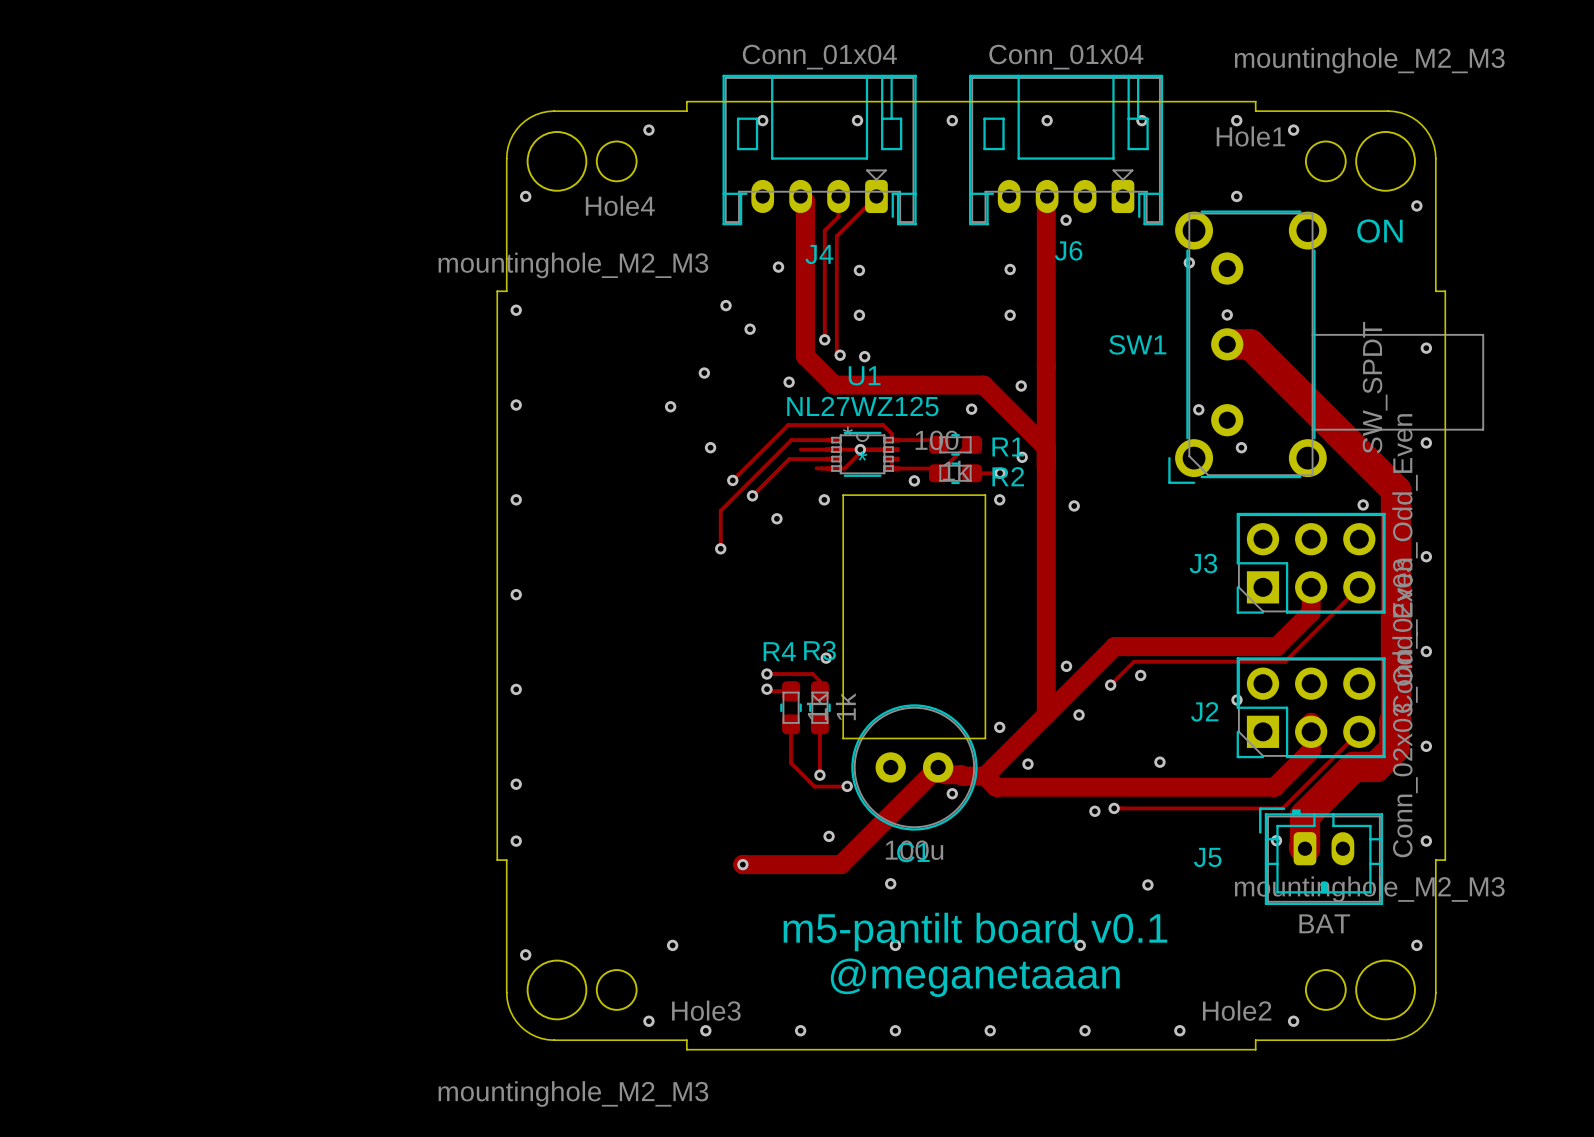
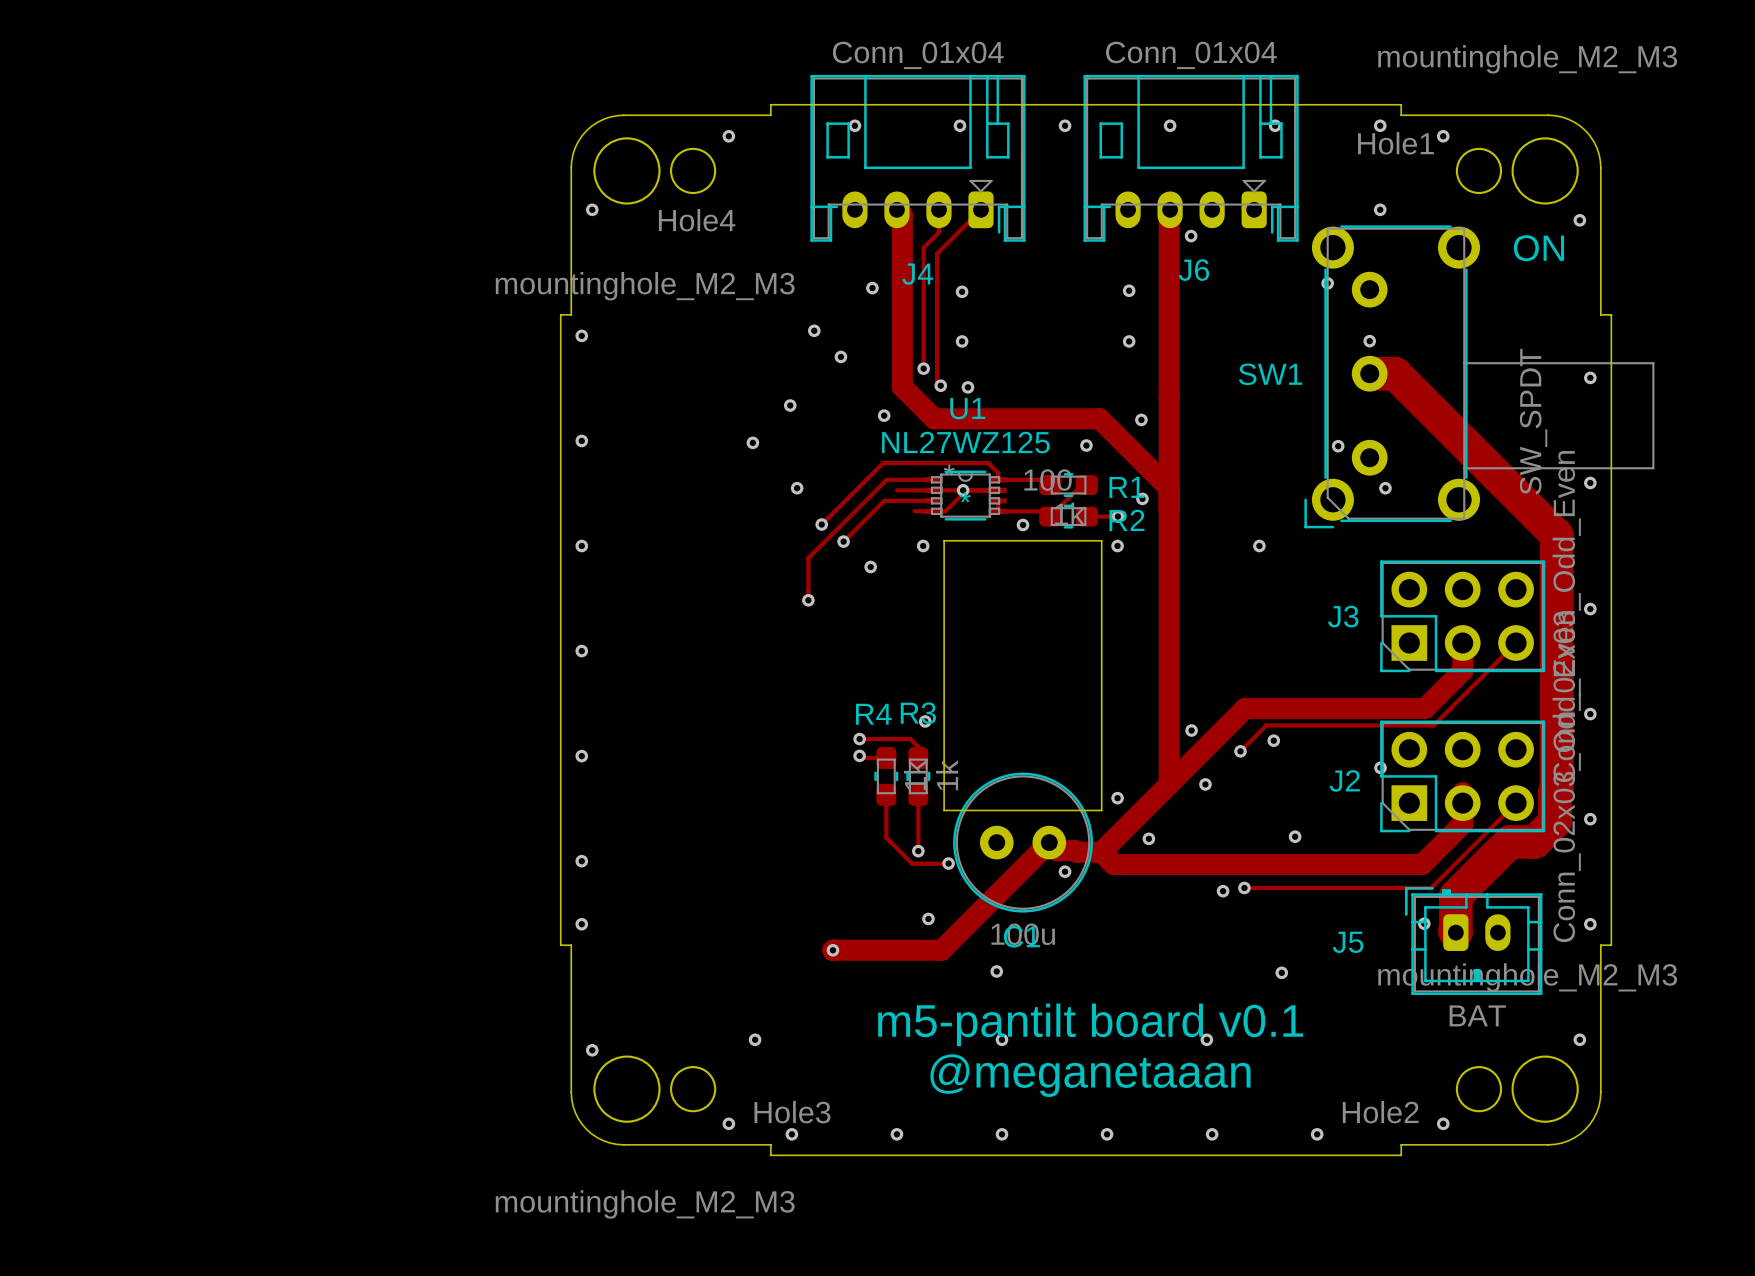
via position: (1074, 505) -> (1259, 546)
via: (1363, 505) -> none

